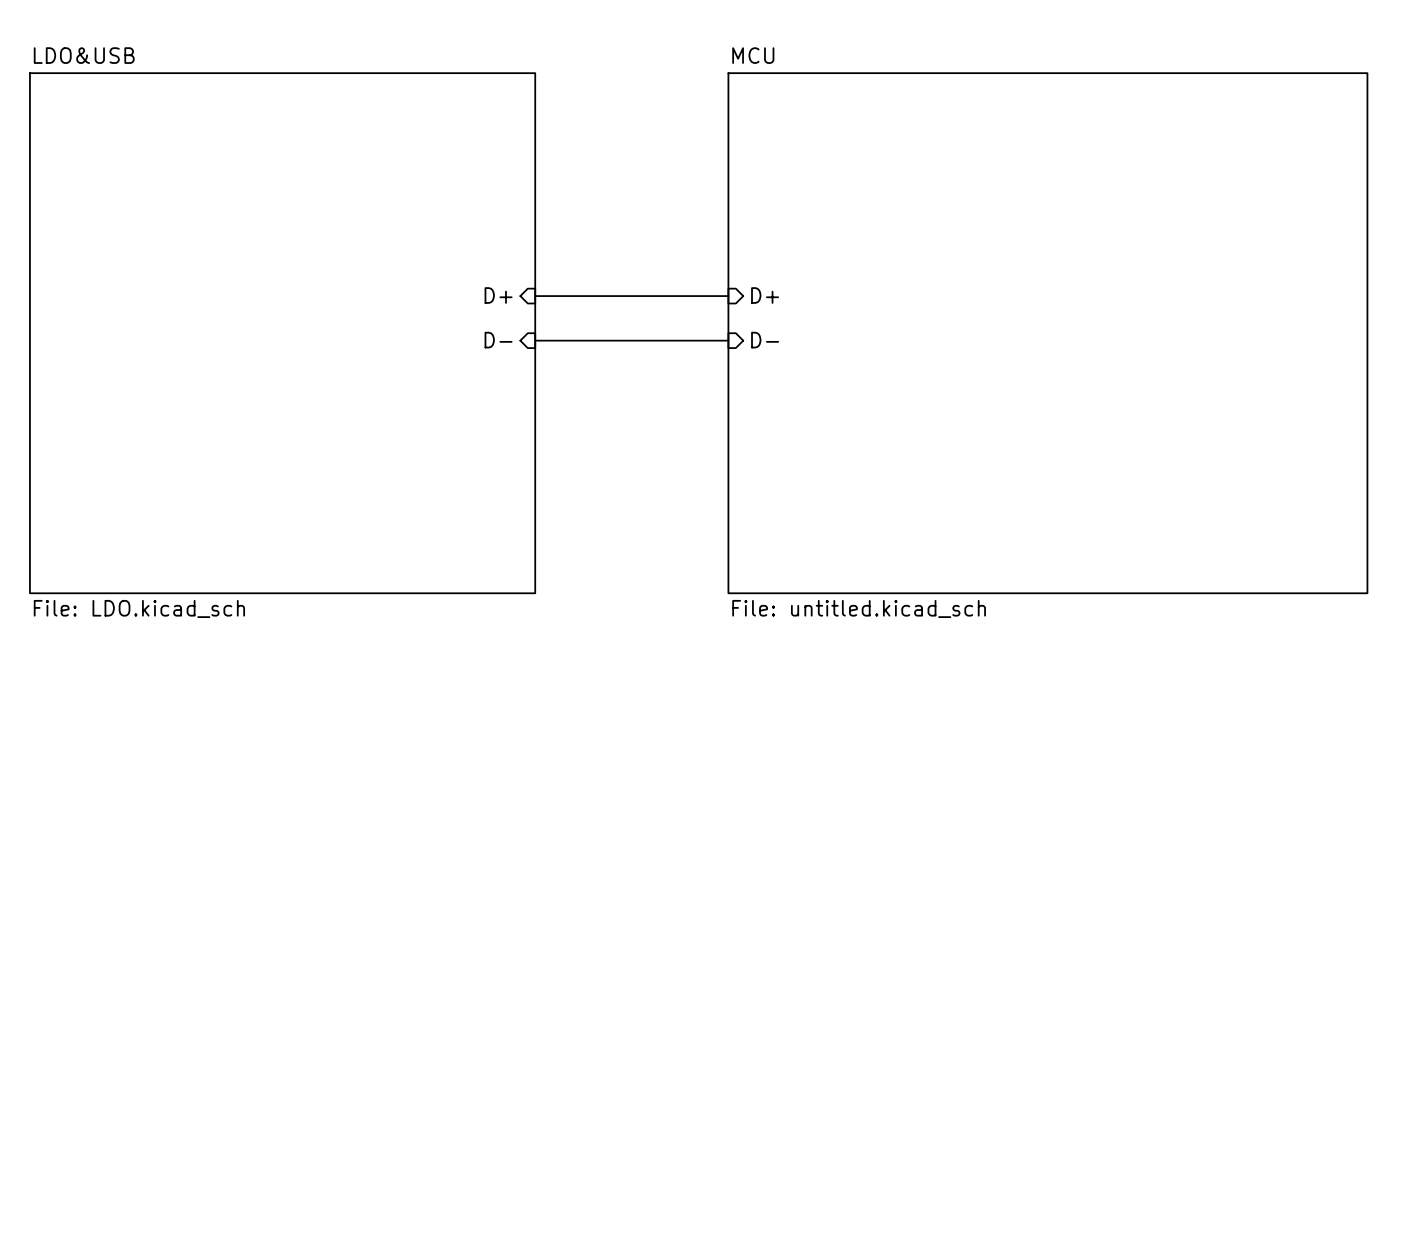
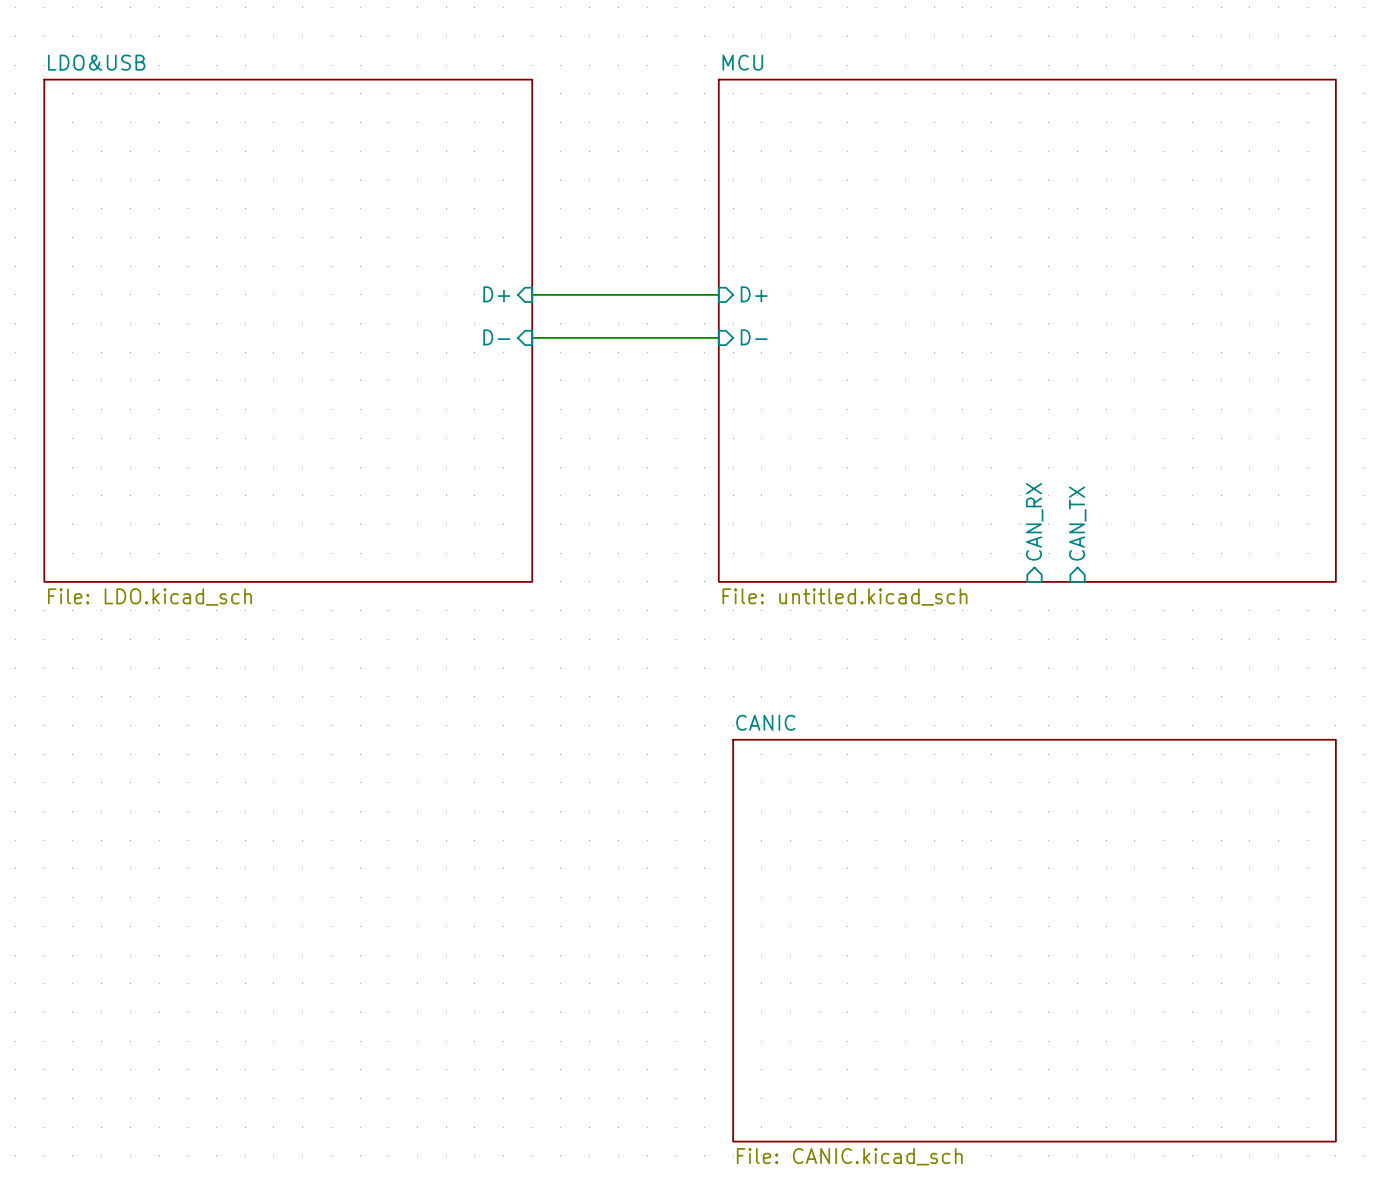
sheet pin: none -> CAN_RX (1034, 521)
sheet pin: none -> CAN_TX (1077, 523)
sheet CANIC: none -> File: CANIC.kicad_sch (1034, 940)

